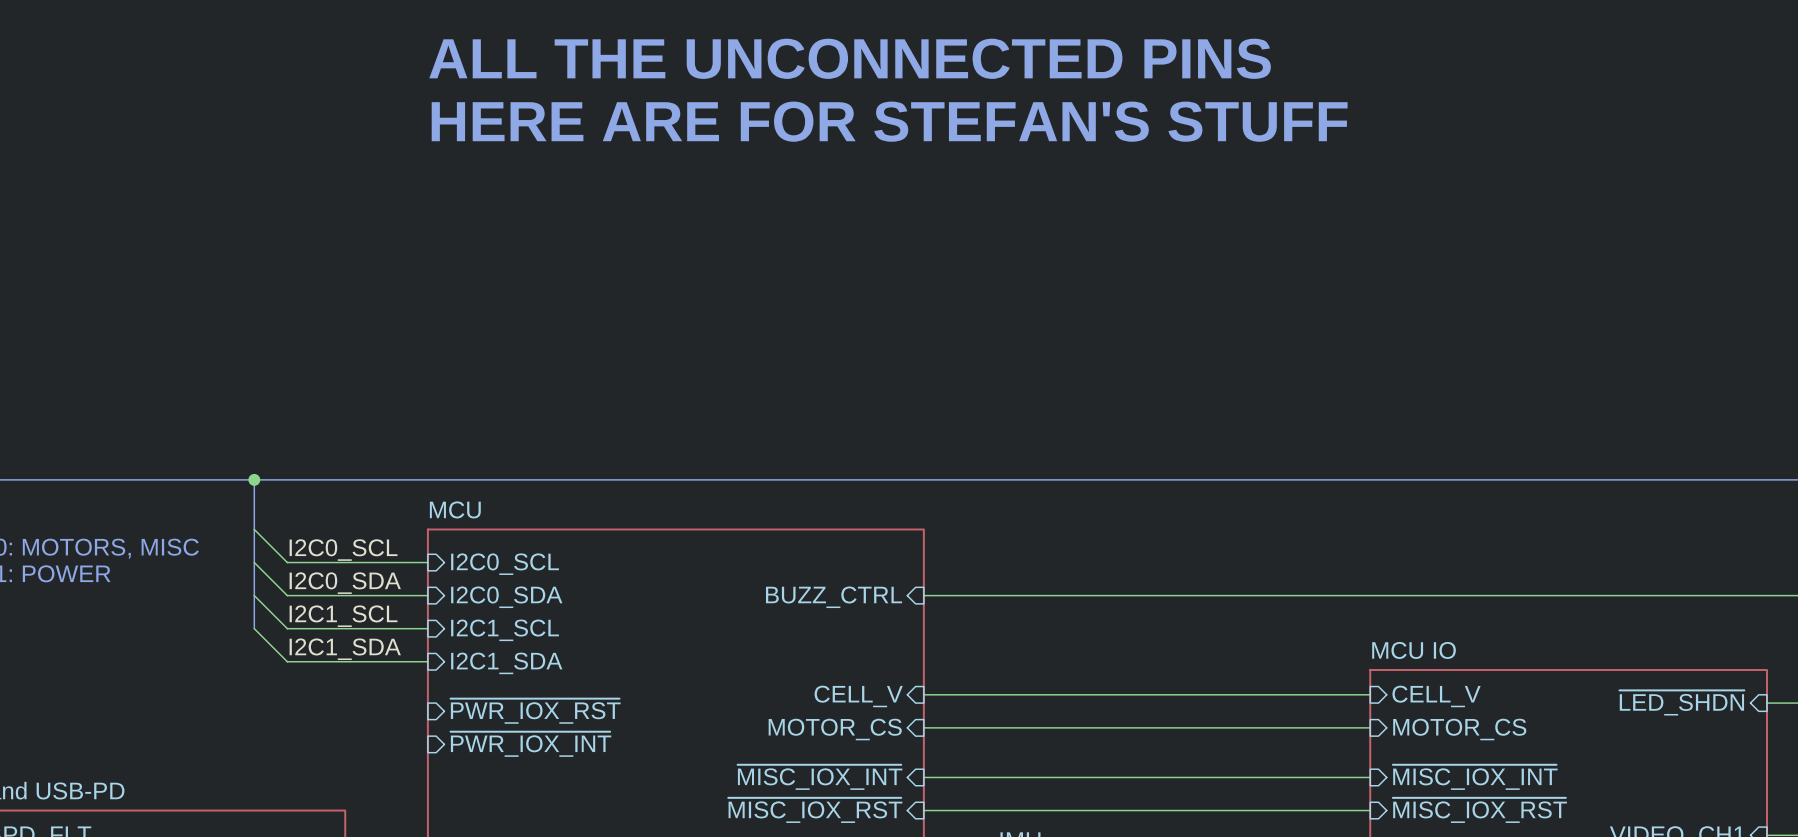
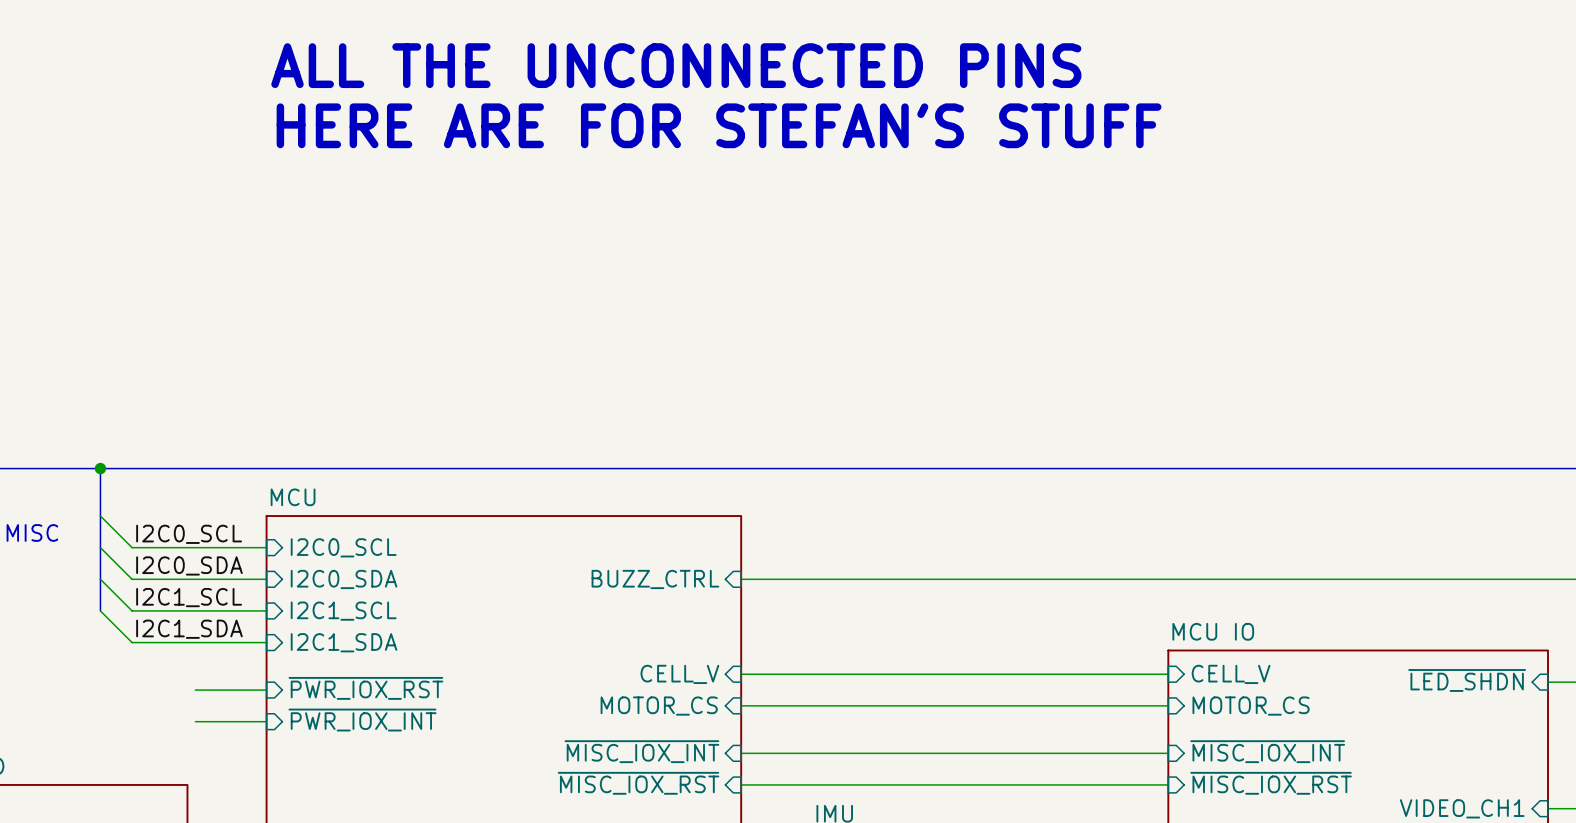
wire: none -> (195, 690) (266, 690)
wire: none -> (195, 721) (266, 721)

